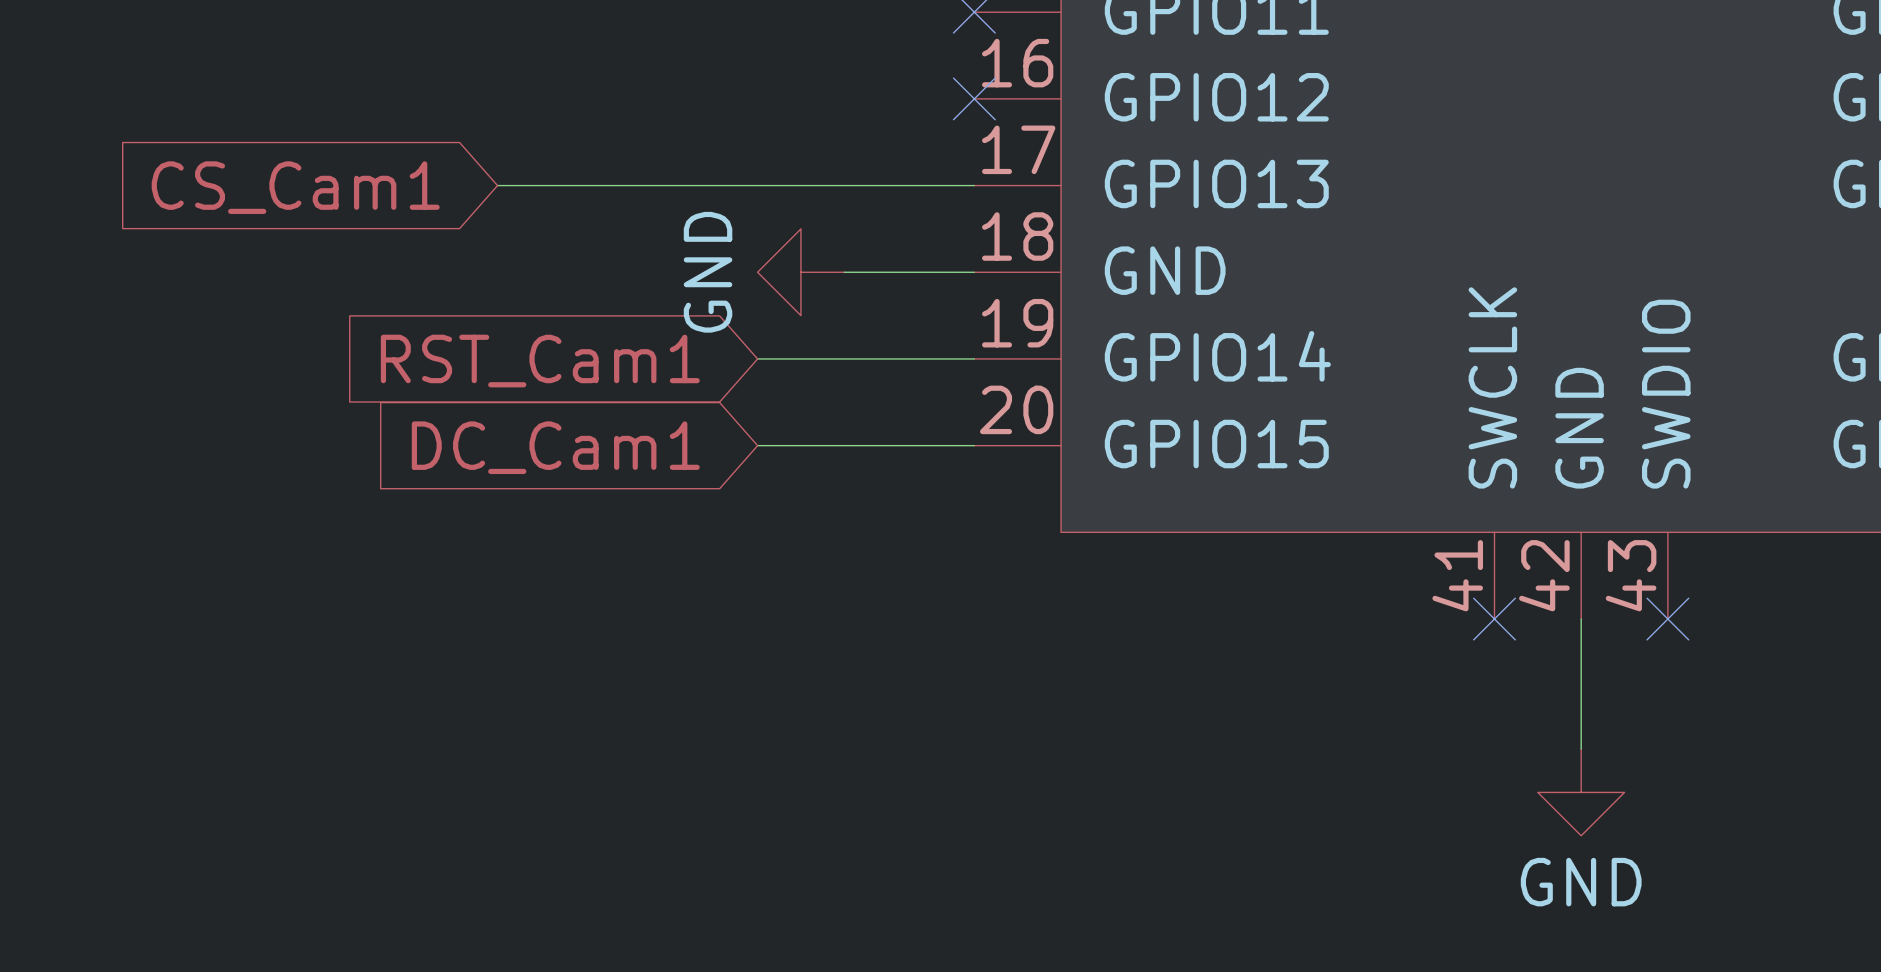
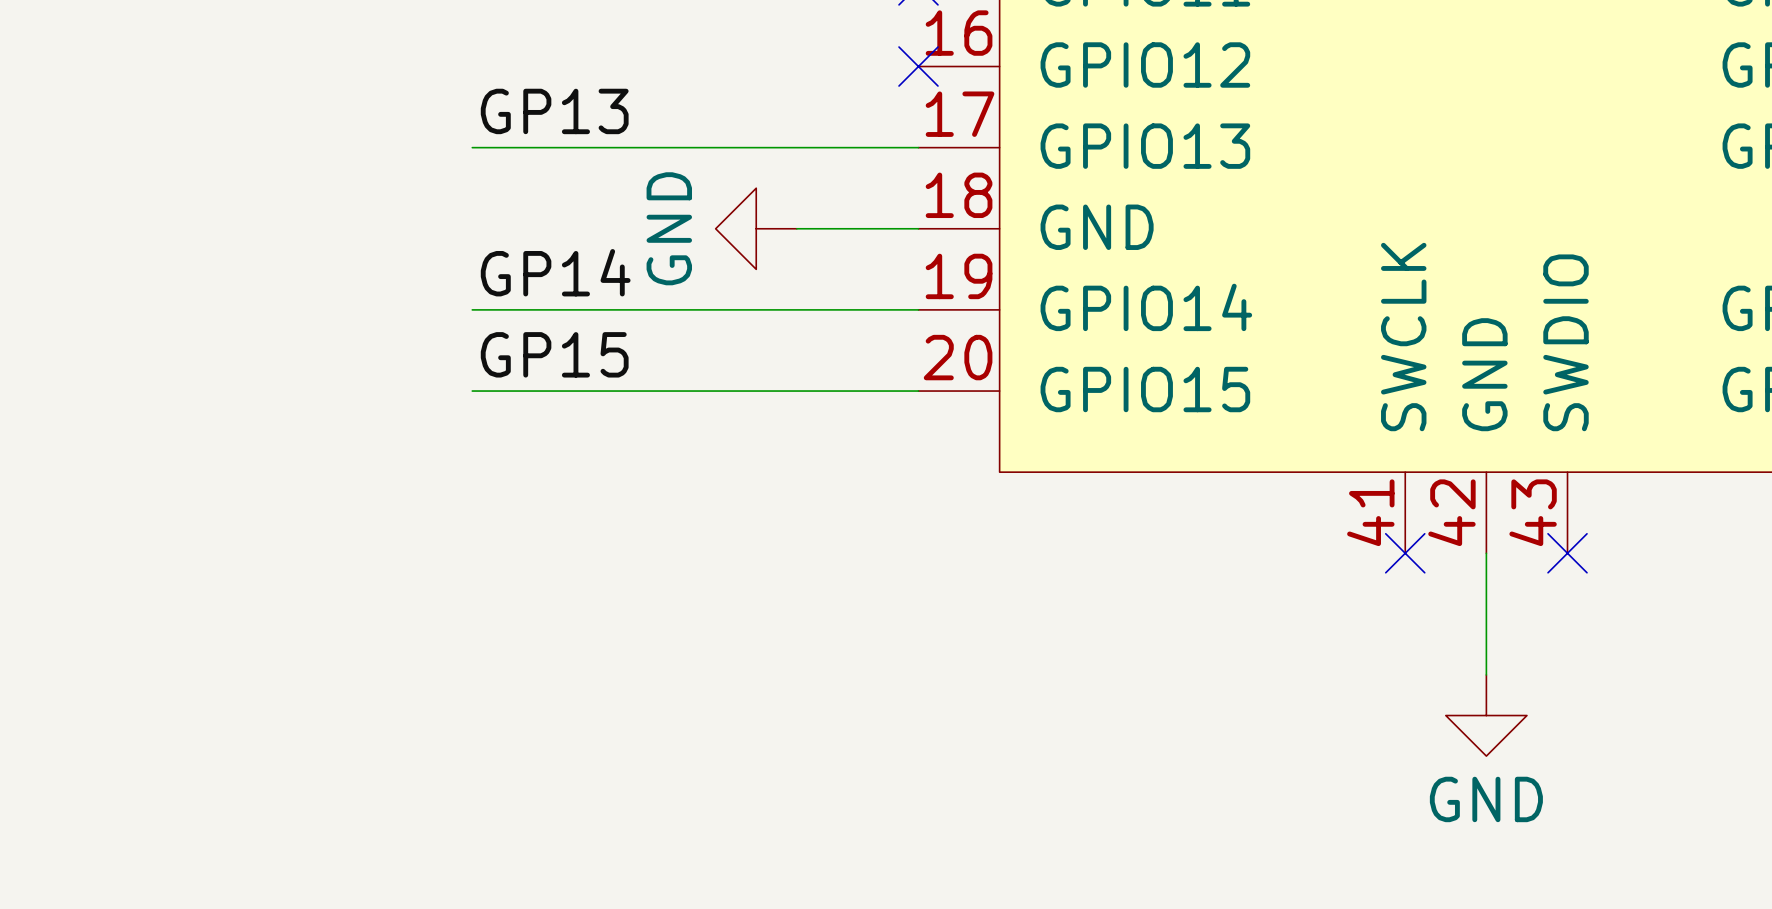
label: none -> GP13 (554, 111)
global label: CS_Cam1 (295, 187) -> none
label: none -> GP14 (555, 272)
wire: none -> (472, 309) (715, 309)
global label: RST_Cam1 (540, 361) -> none
label: none -> GP15 (554, 354)
wire: none -> (472, 391) (715, 391)
global label: DC_Cam1 (555, 447) -> none

